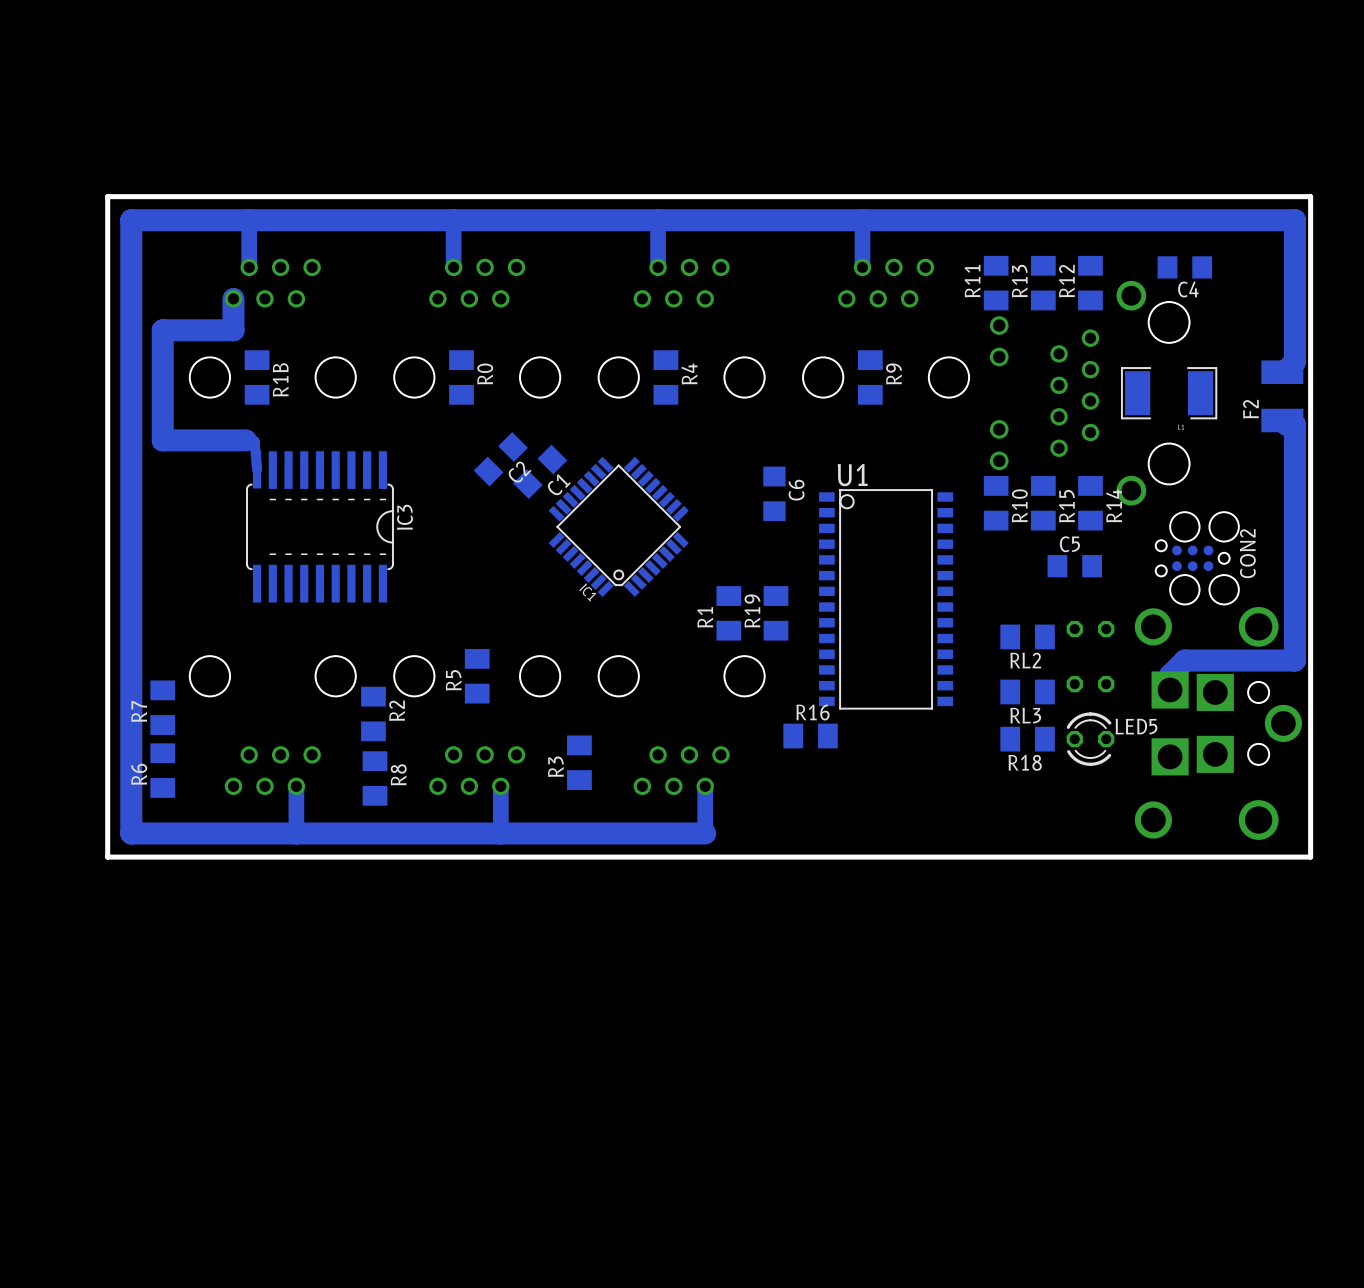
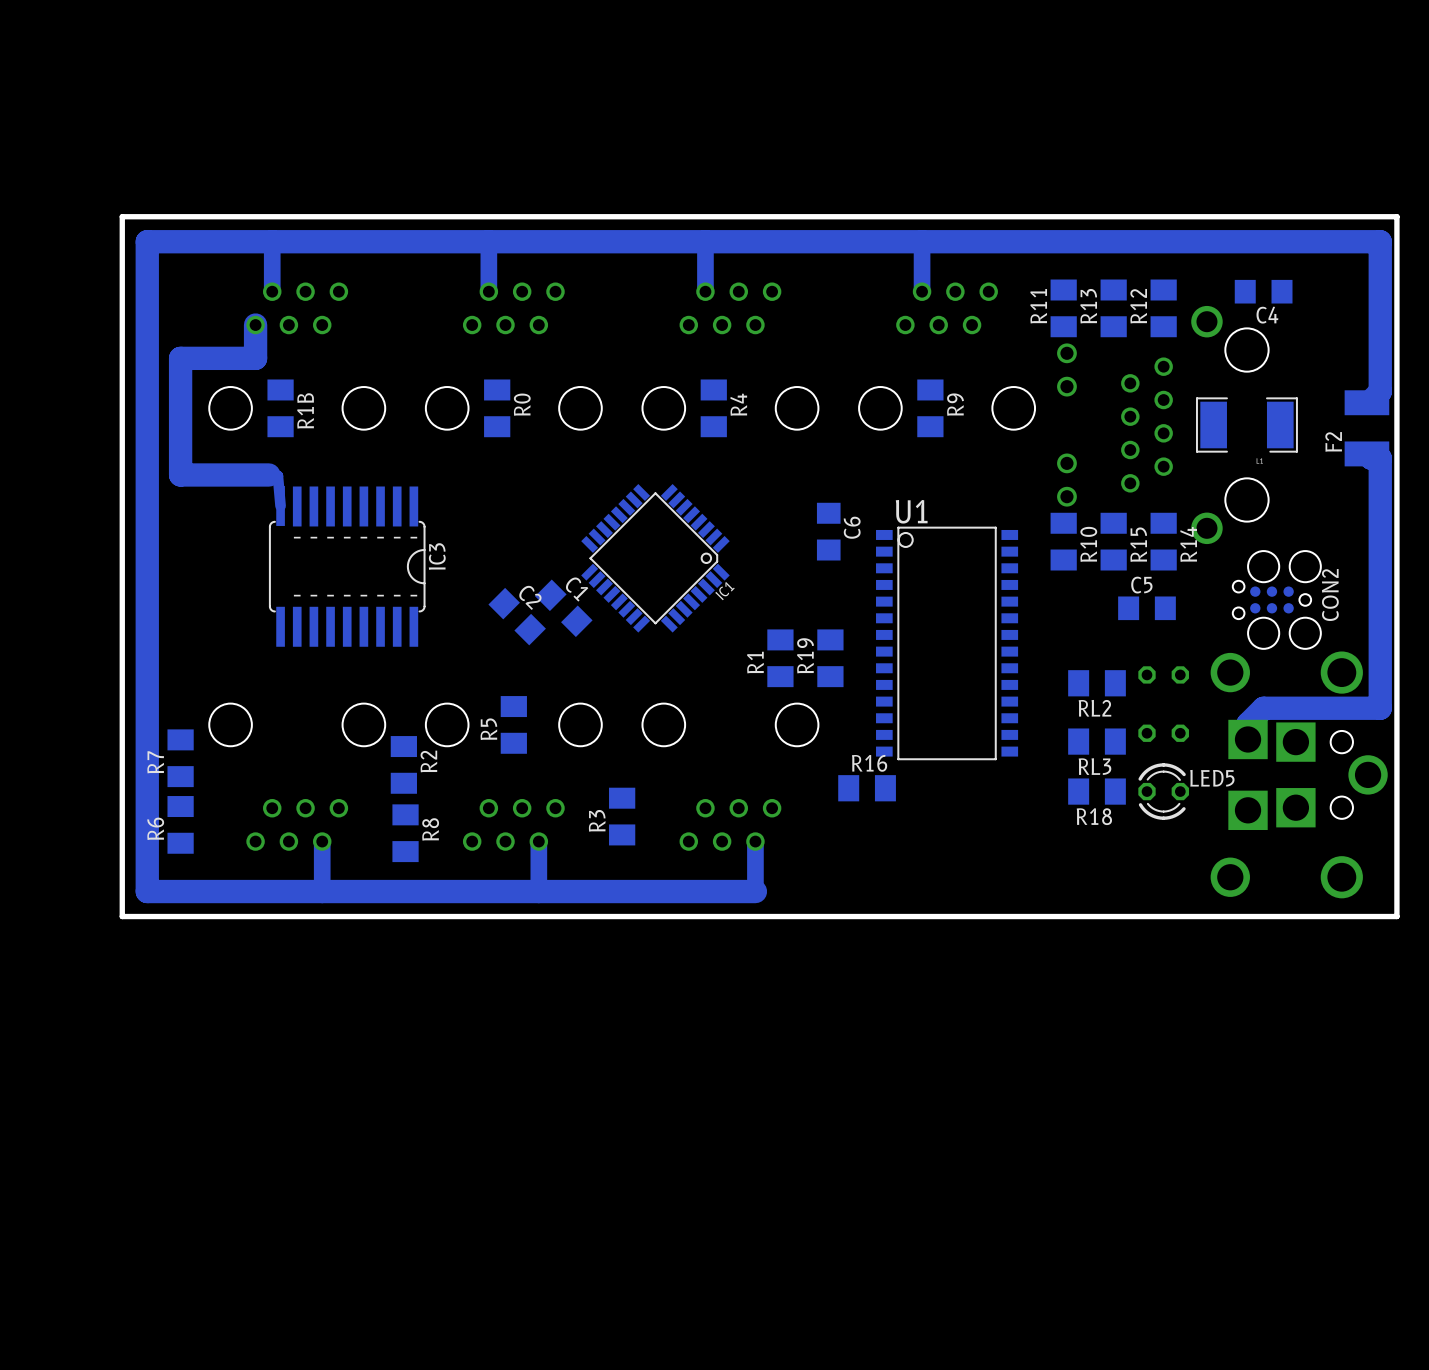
C2 rotation: 0° (500, 459) -> 90° clockwise (517, 616)
C2 position: (500, 459) -> (517, 616)
C1 rotation: 0° (540, 471) -> 90° clockwise (563, 608)
C1 position: (540, 471) -> (563, 608)
C2 name position: C2 (519, 472) -> C2 (530, 597)
C1 name position: C1 (559, 484) -> C1 (577, 589)
IC1 rotation: 0° (618, 526) -> 90° counterclockwise (655, 558)

